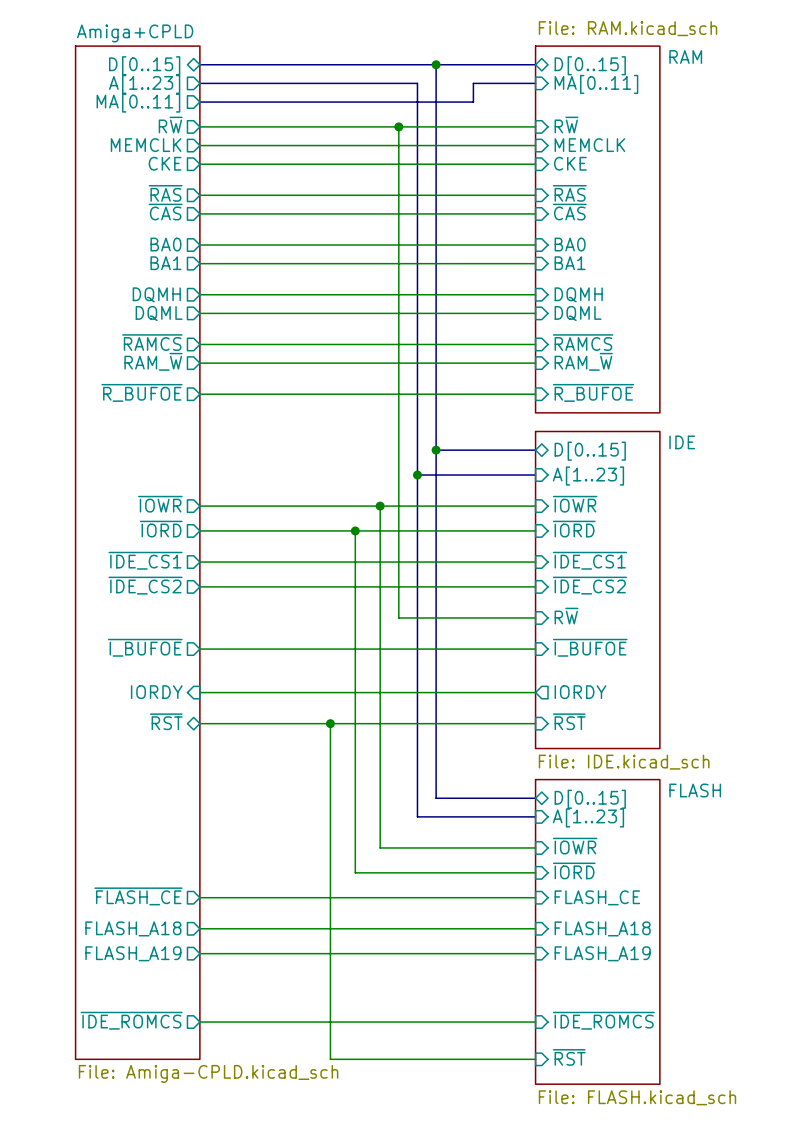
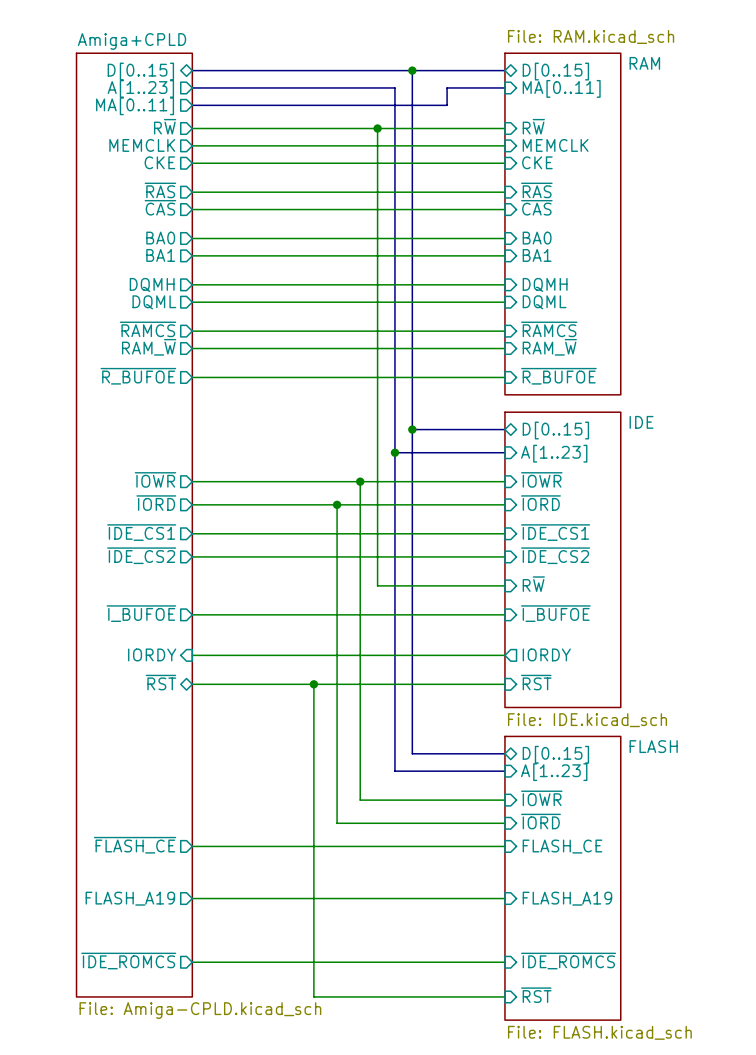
sheet pin: FLASH_A18 (133, 928) -> none
wire: (199, 928) (535, 928) -> none
sheet pin: FLASH_A18 (602, 928) -> none

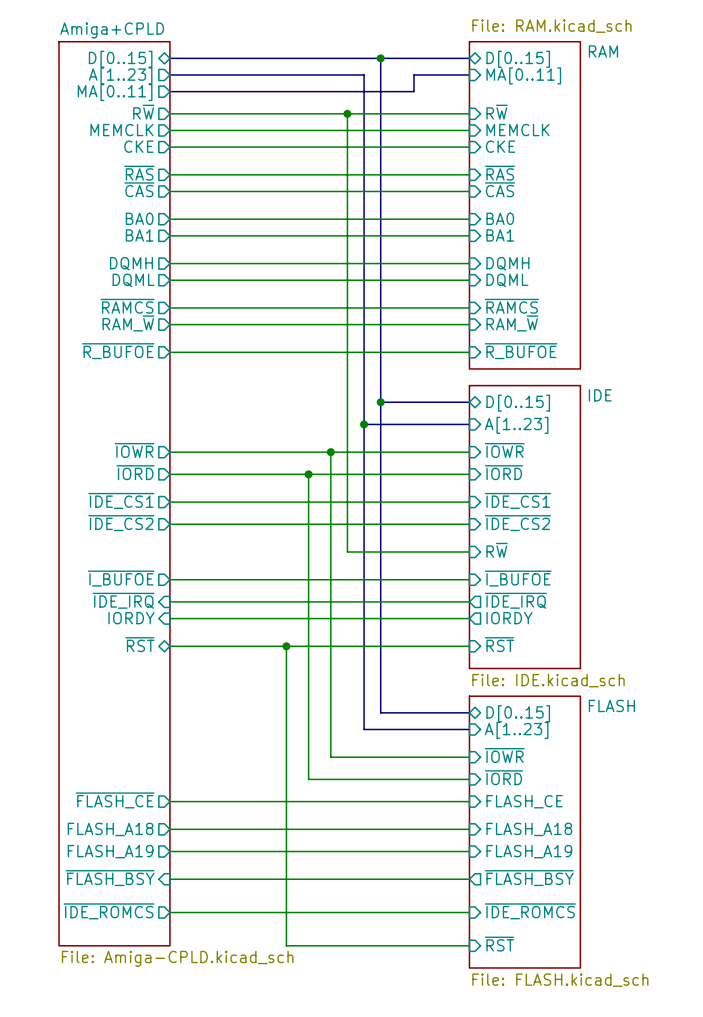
sheet pin: none -> ~{IDE_IRQ} (123, 600)
sheet pin: none -> ~{IDE_IRQ} (515, 600)
wire: none -> (169, 601) (469, 601)
sheet pin: none -> FLASH_A18 (110, 829)
wire: none -> (169, 829) (469, 829)
sheet pin: none -> FLASH_A18 (529, 829)
sheet pin: none -> ~{FLASH_BSY} (110, 878)
sheet pin: none -> ~{FLASH_BSY} (529, 878)
wire: none -> (169, 879) (469, 879)

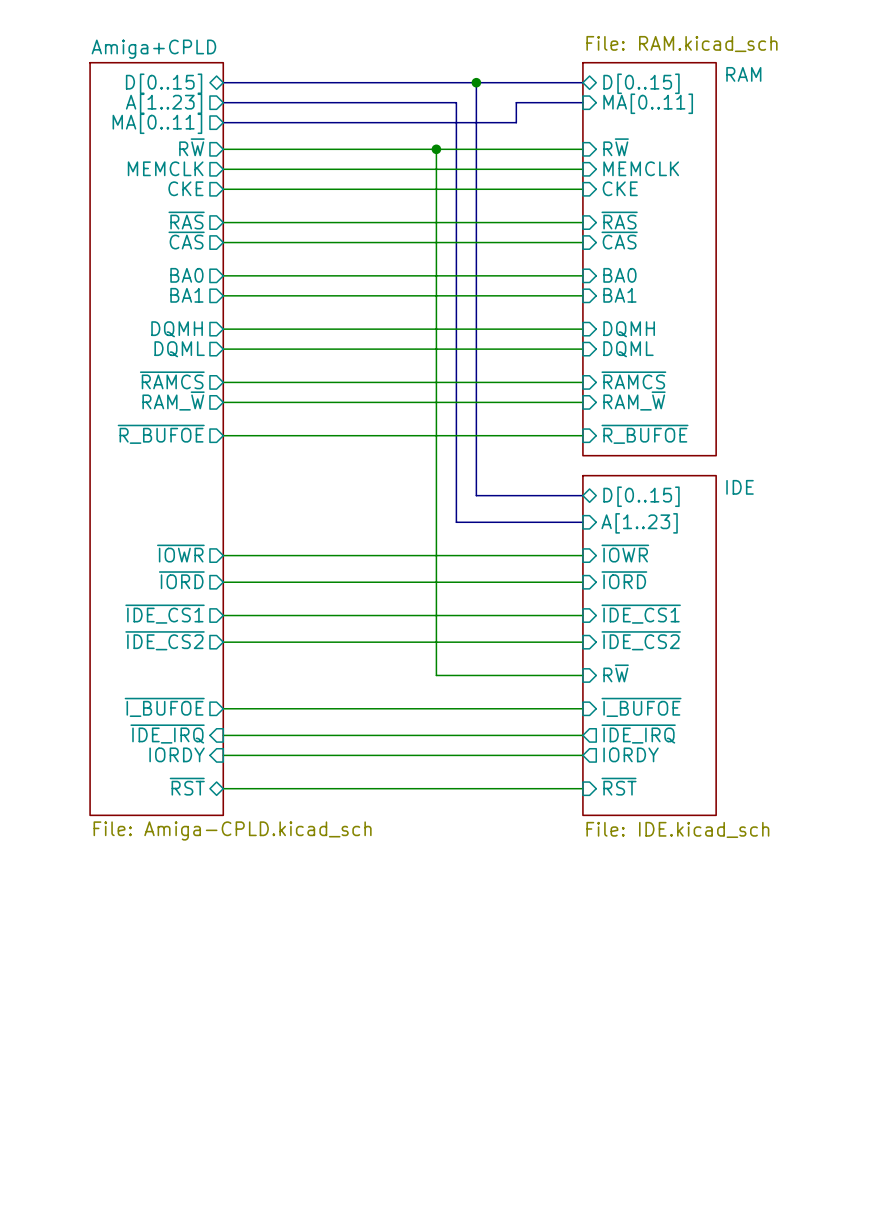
sheet Amiga+CPLD: none -> File: Amiga-CPLD.kicad_sch (156, 439)
bus: (380, 402) (380, 712) (469, 712) -> none
junction: (380, 402) -> none
bus: (364, 424) (364, 729) (469, 729) -> none
junction: (364, 424) -> none
wire: (330, 452) (330, 757) (469, 757) -> none
junction: (330, 452) -> none
wire: (308, 474) (308, 779) (469, 779) -> none
junction: (308, 474) -> none
sheet Amiga+CPLD: File: Amiga-CPLD.kicad_sch (114, 493) -> none
wire: (286, 646) (286, 945) (469, 945) -> none
junction: (286, 646) -> none
sheet pin: D[0..15] (518, 713) -> none
sheet pin: A[1..23] (516, 730) -> none
sheet pin: ~{IOWR} (504, 755) -> none
sheet pin: ~{IORD} (503, 777) -> none
sheet pin: ~{FLASH_CE} (115, 800) -> none
wire: (169, 801) (469, 801) -> none
sheet pin: FLASH_CE (524, 801) -> none
sheet pin: FLASH_A18 (110, 829) -> none
wire: (169, 829) (469, 829) -> none
sheet pin: FLASH_A18 (529, 829) -> none
sheet FLASH: File: FLASH.kicad_sch (524, 832) -> none
sheet pin: FLASH_A19 (110, 851) -> none
wire: (169, 851) (469, 851) -> none
sheet pin: FLASH_A19 (529, 851) -> none
sheet pin: ~{FLASH_BSY} (110, 878) -> none
sheet pin: ~{FLASH_BSY} (529, 878) -> none
wire: (169, 879) (469, 879) -> none
sheet pin: ~{IDE_ROMCS} (109, 911) -> none
sheet pin: ~{IDE_ROMCS} (530, 911) -> none
wire: (169, 912) (469, 912) -> none
sheet pin: ~{RST} (499, 944) -> none

